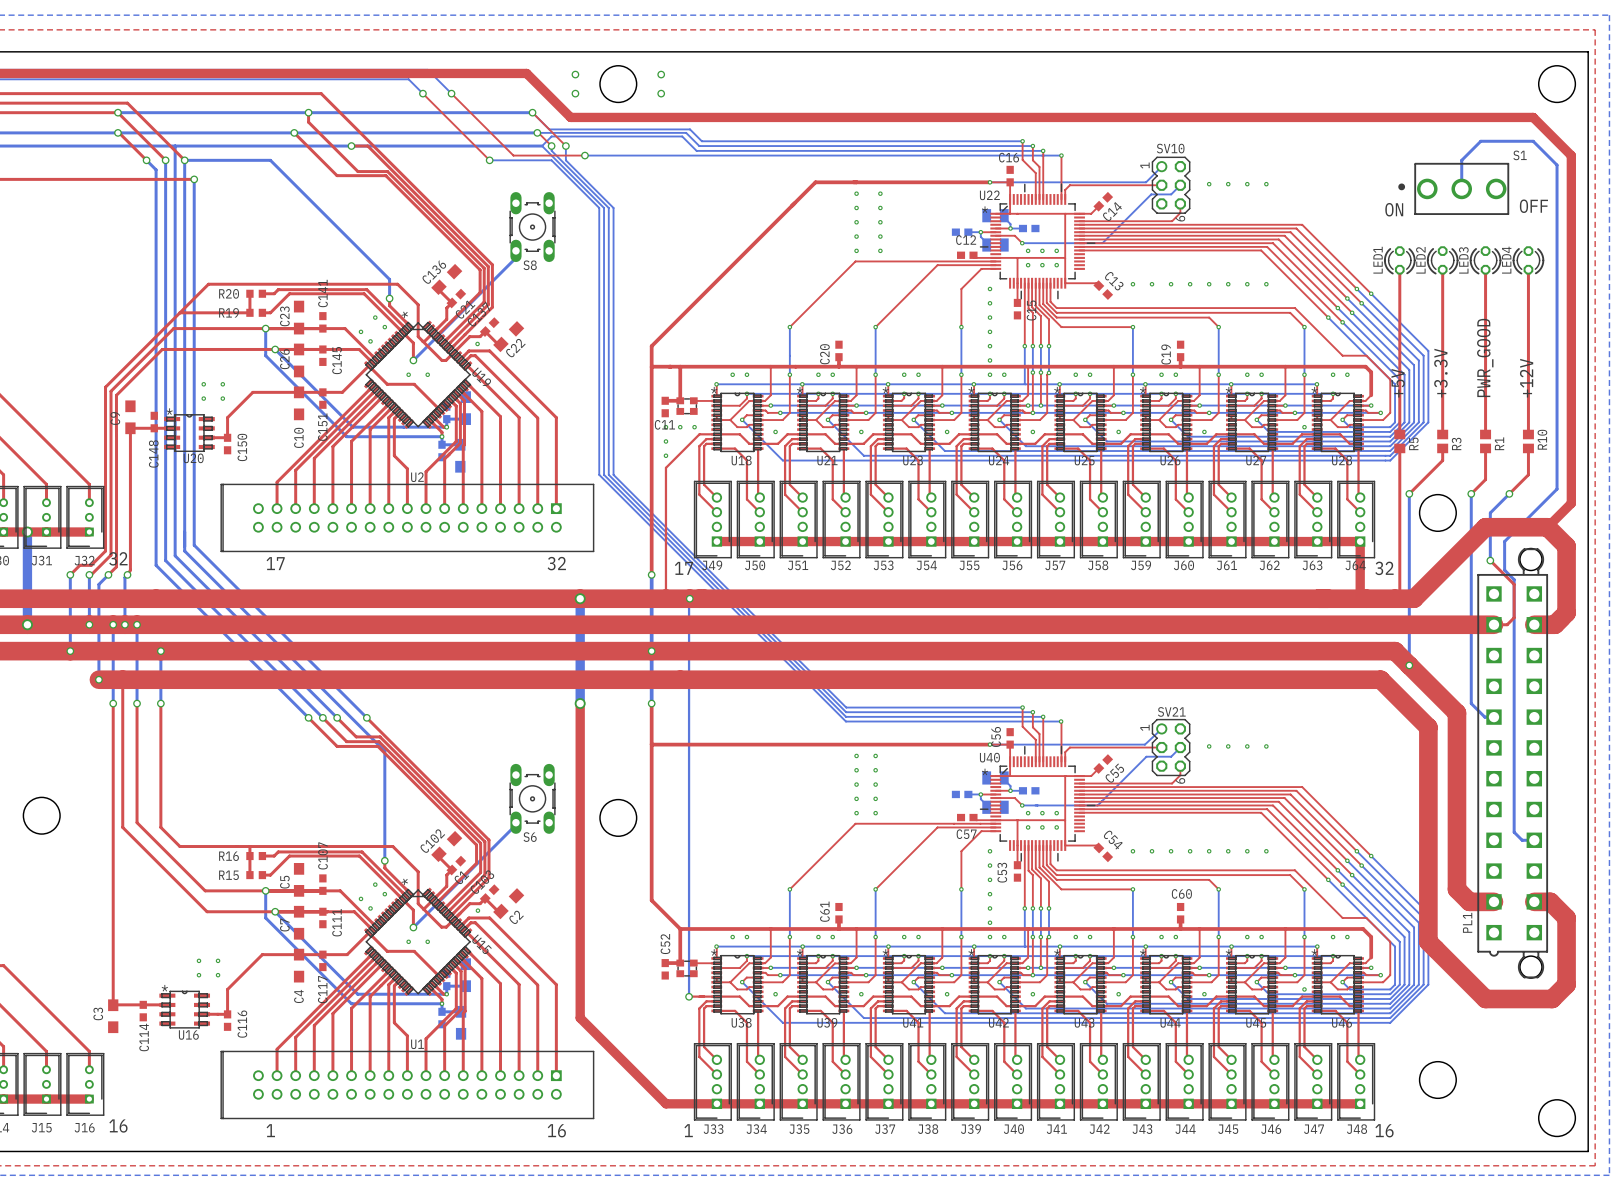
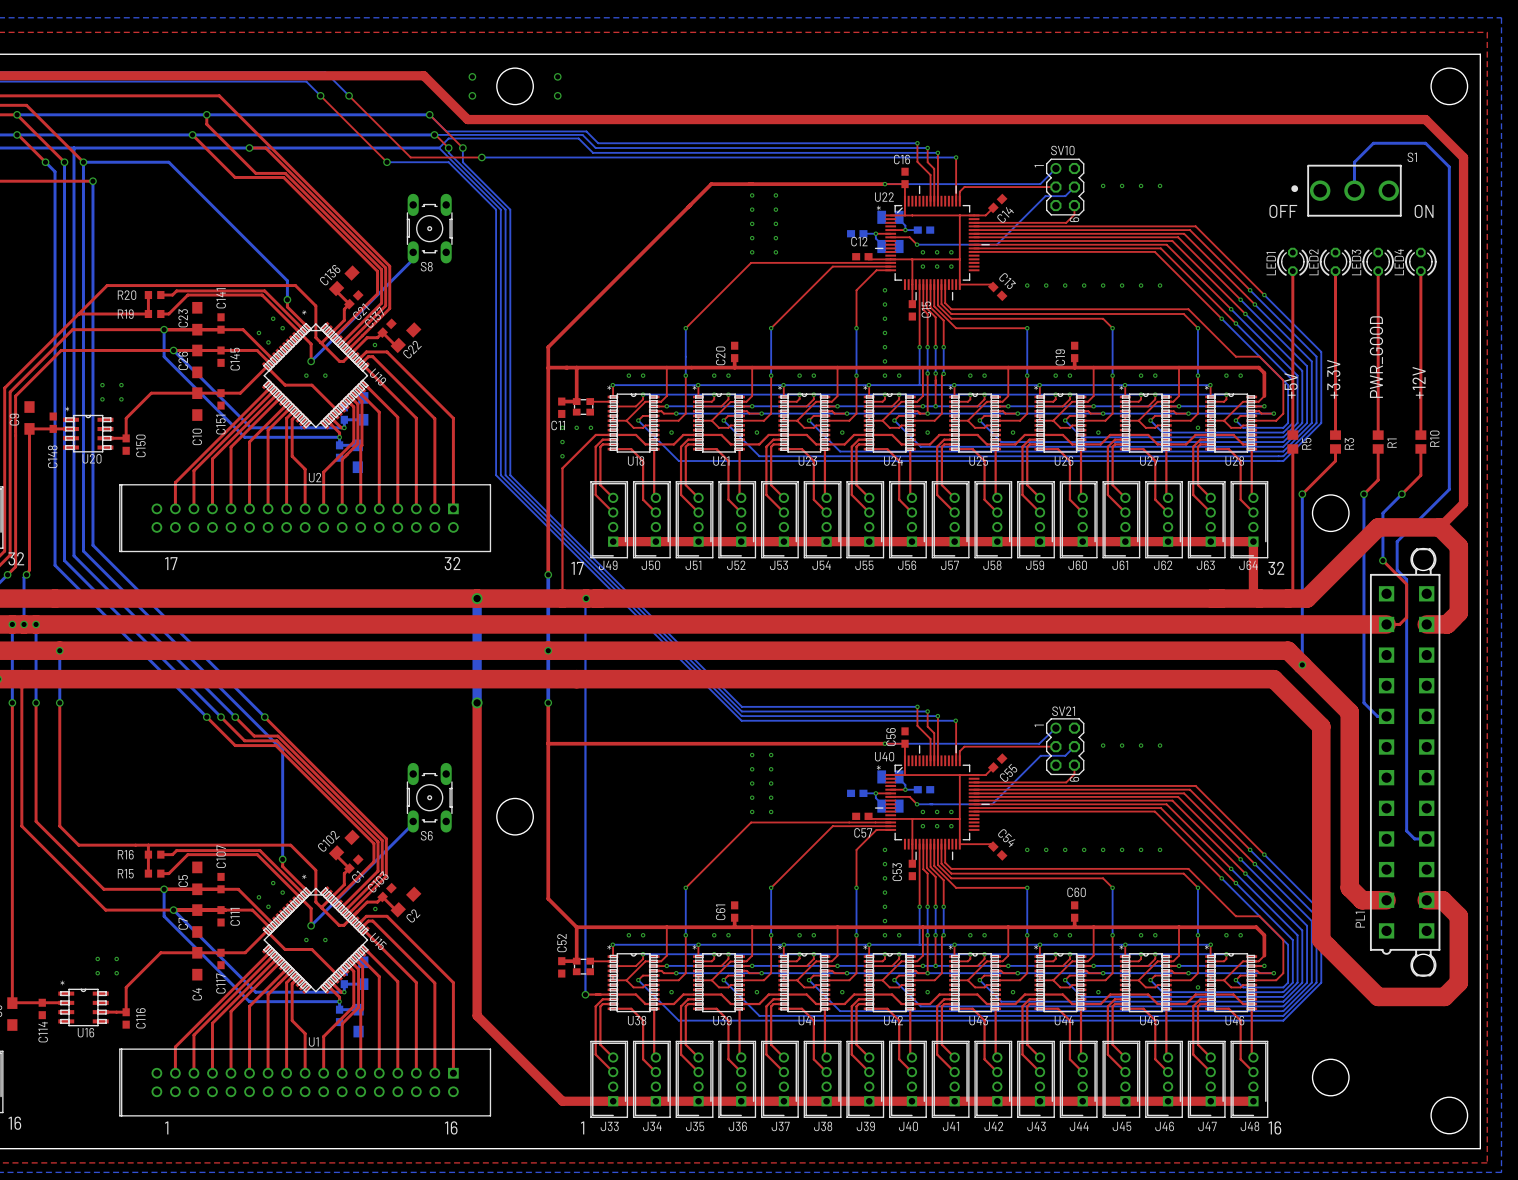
text: OFF (1533, 206) -> none
text: ON (1394, 209) -> OFF (1283, 211)
text: none -> ON (1424, 211)

